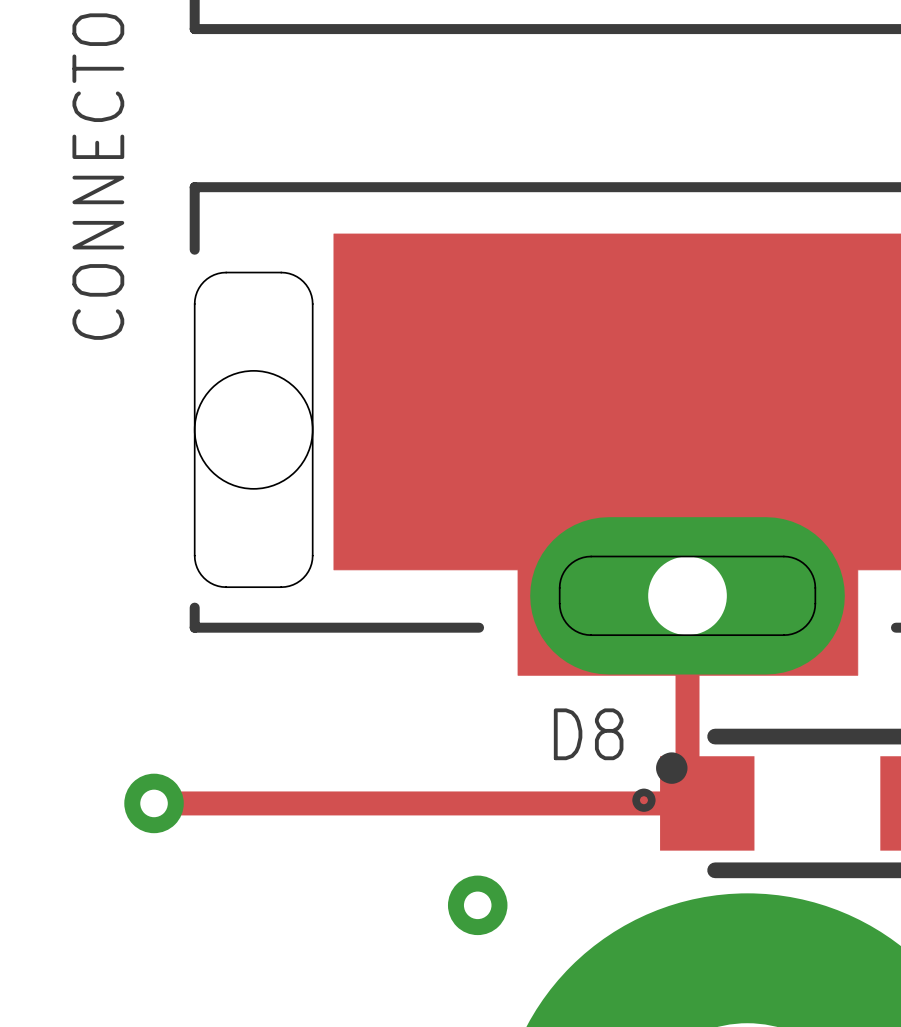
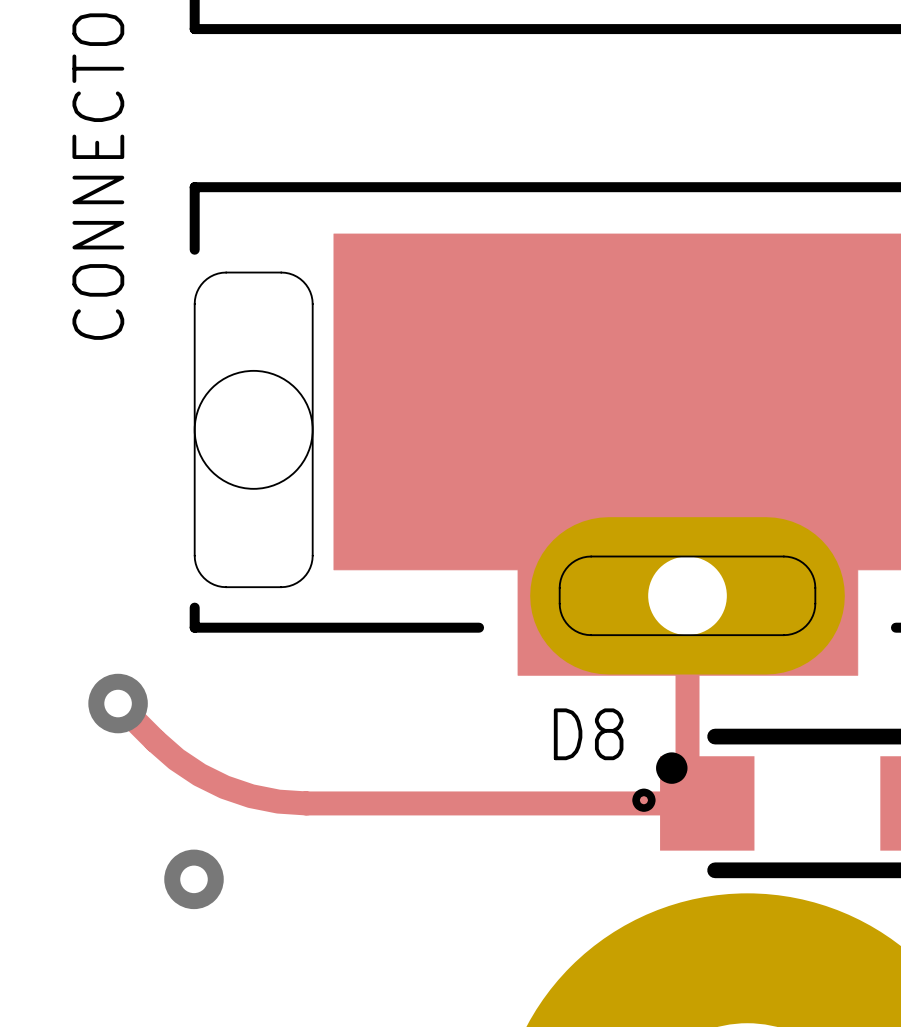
via: none -> (118, 703)
track: (154, 803) (306, 803) -> (118, 703) (176, 759) (199, 774) (224, 787) (251, 796) (278, 801) (306, 803)
via: (154, 803) -> none
via: none -> (194, 879)
via: (477, 905) -> none

